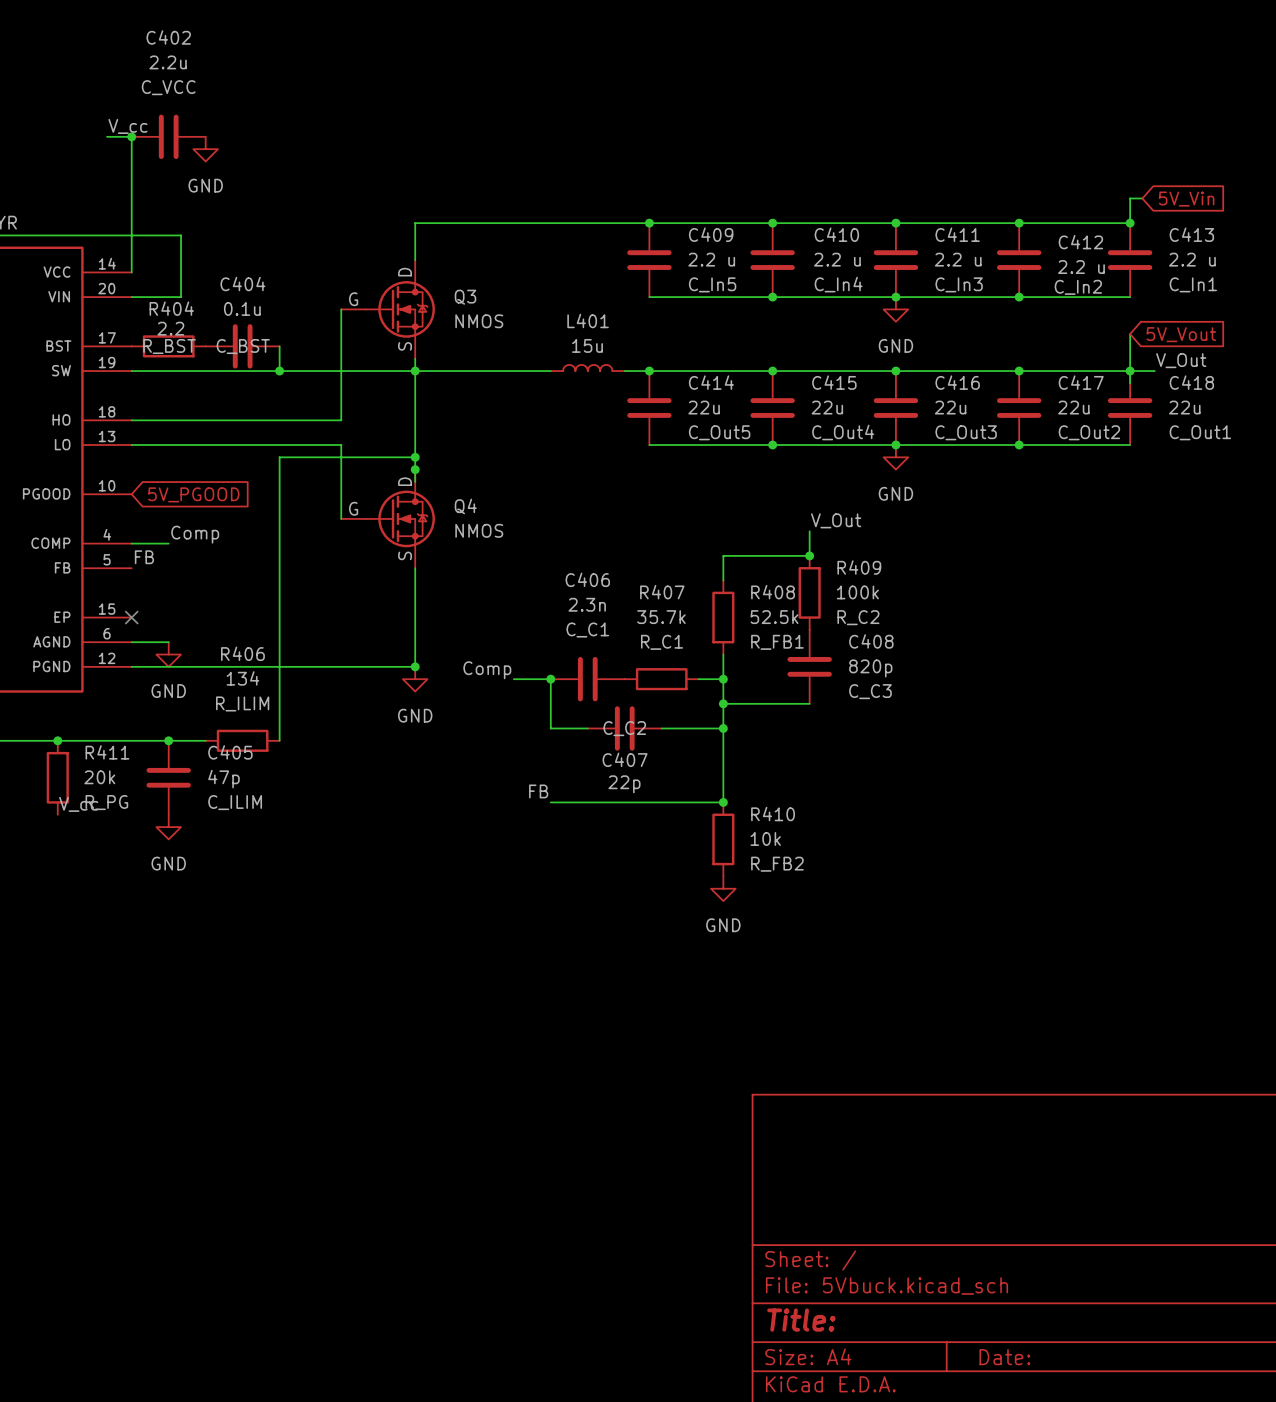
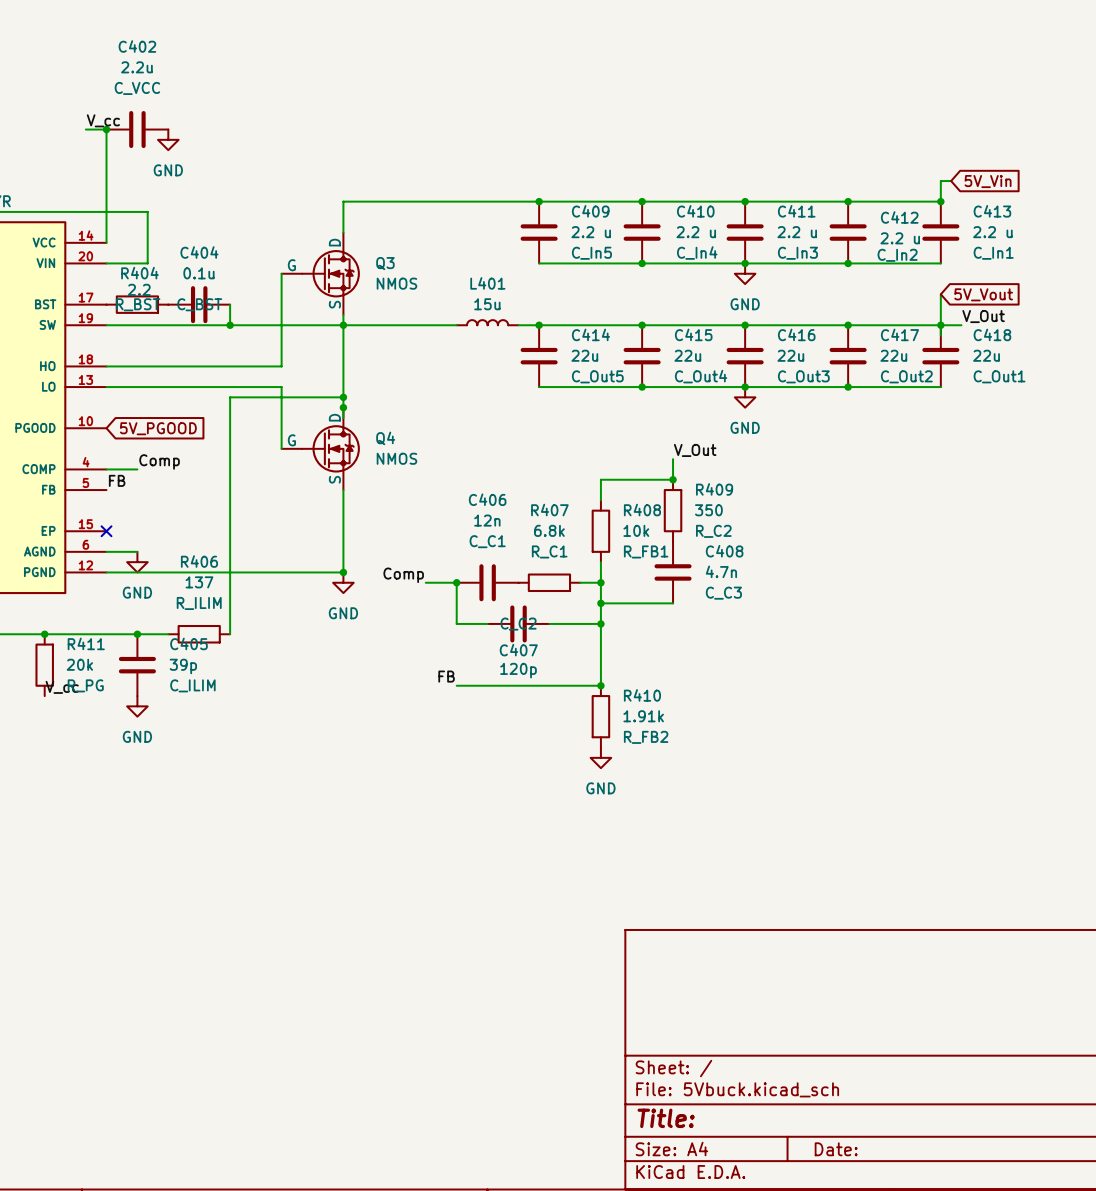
R409 value: 100k (857, 592) -> 350 (708, 510)
C406 value: 2.3n (587, 604) -> 12n (487, 520)
R407 value: 35.7k (661, 617) -> 6.8k (549, 530)
R408 value: 52.5k (774, 617) -> 10k (636, 530)
C408 value: 820p (870, 668) -> 4.7n (721, 571)
R406 value: 134 (242, 678) -> 137 (199, 582)
C405 value: 47p (223, 779) -> 39p (183, 666)
C407 value: 22p (624, 784) -> 120p (518, 670)
R410 value: 10k (765, 838) -> 1.91k (643, 716)

